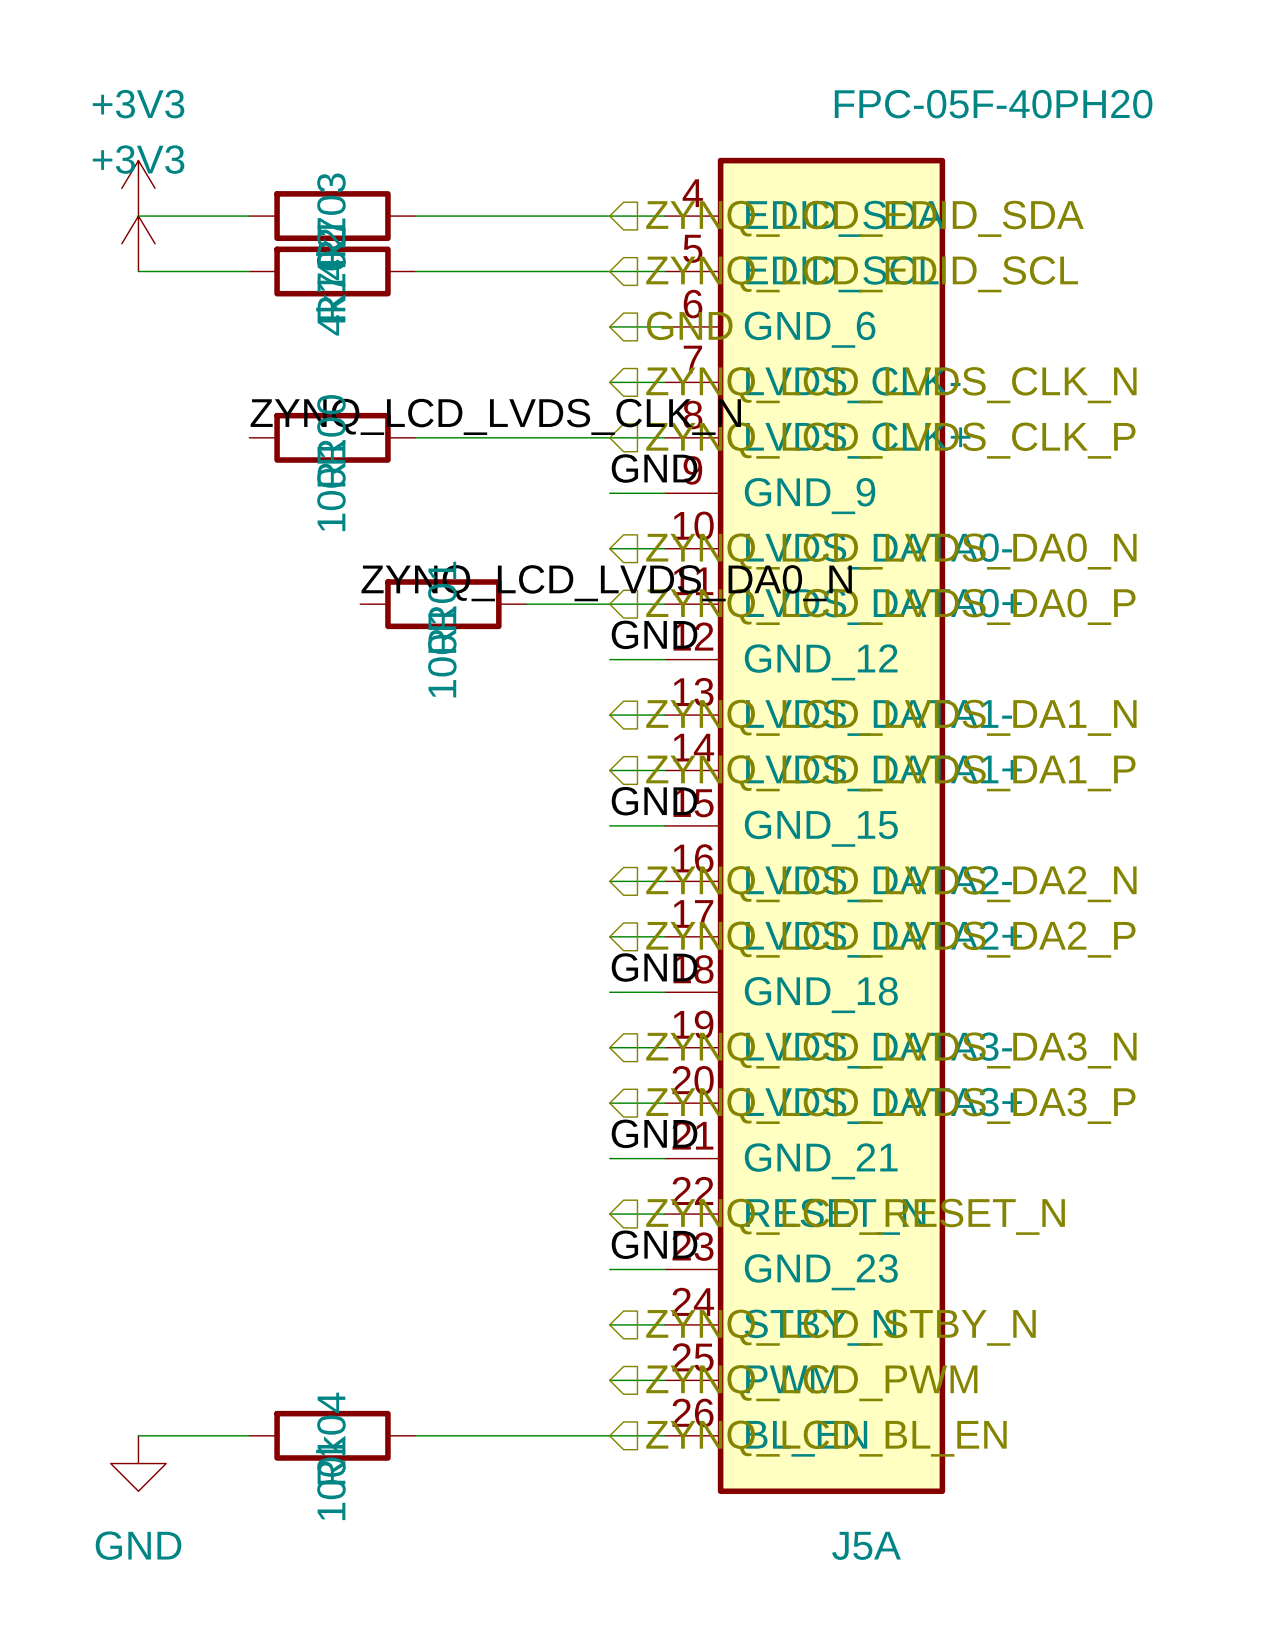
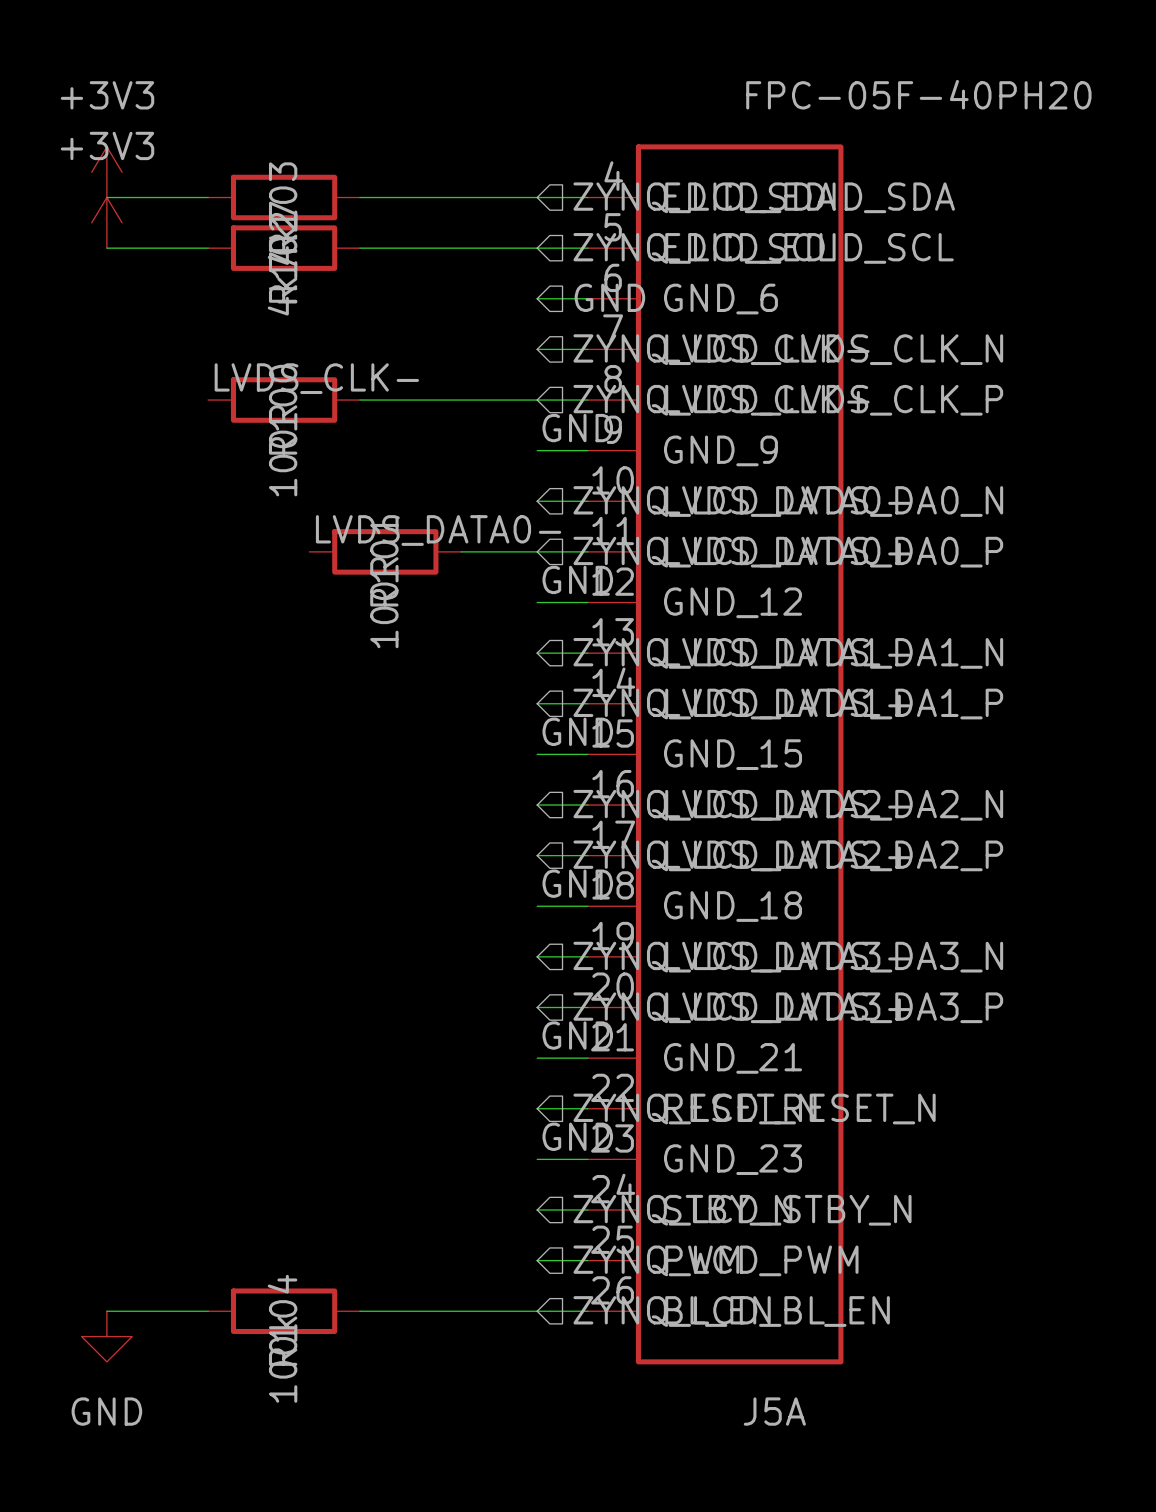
label: ZYNQ_LCD_LVDS_CLK_N (495, 416) -> LVDS_CLK- (316, 378)
label: ZYNQ_LCD_LVDS_DA0_N (606, 583) -> LVDS_DATA0- (438, 530)

